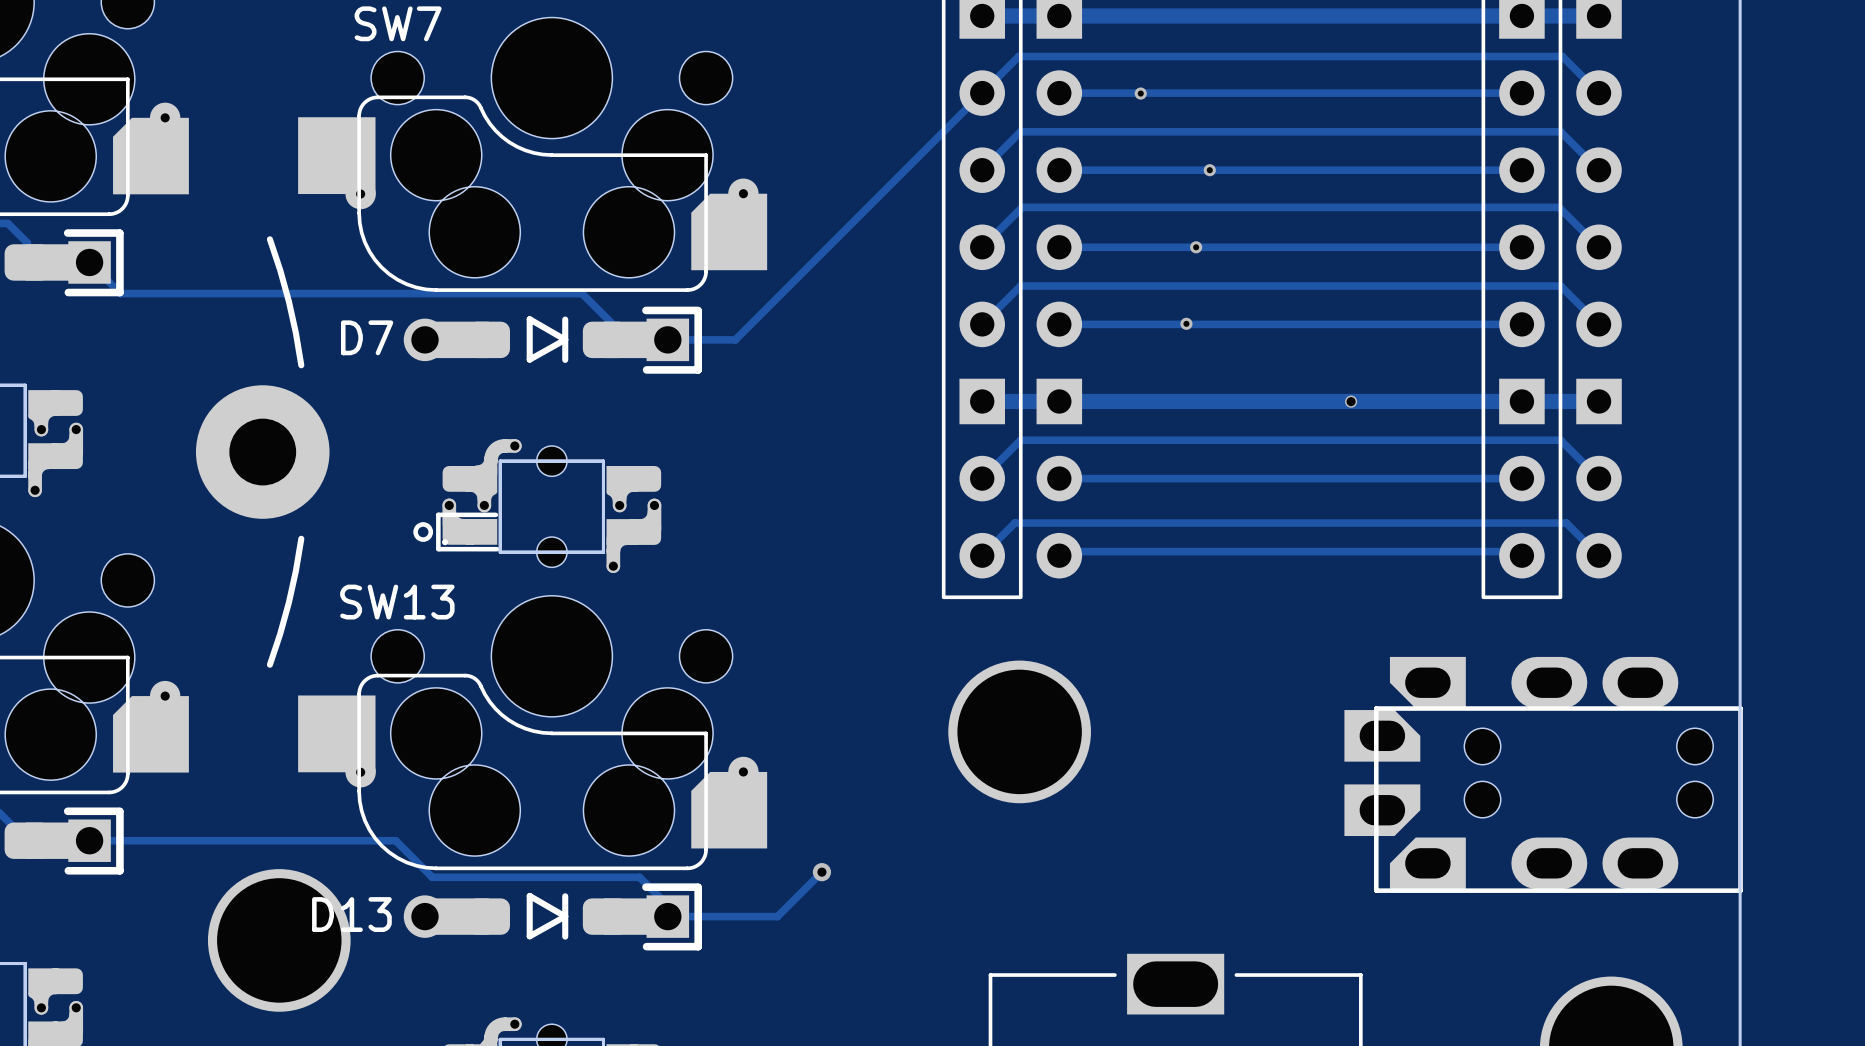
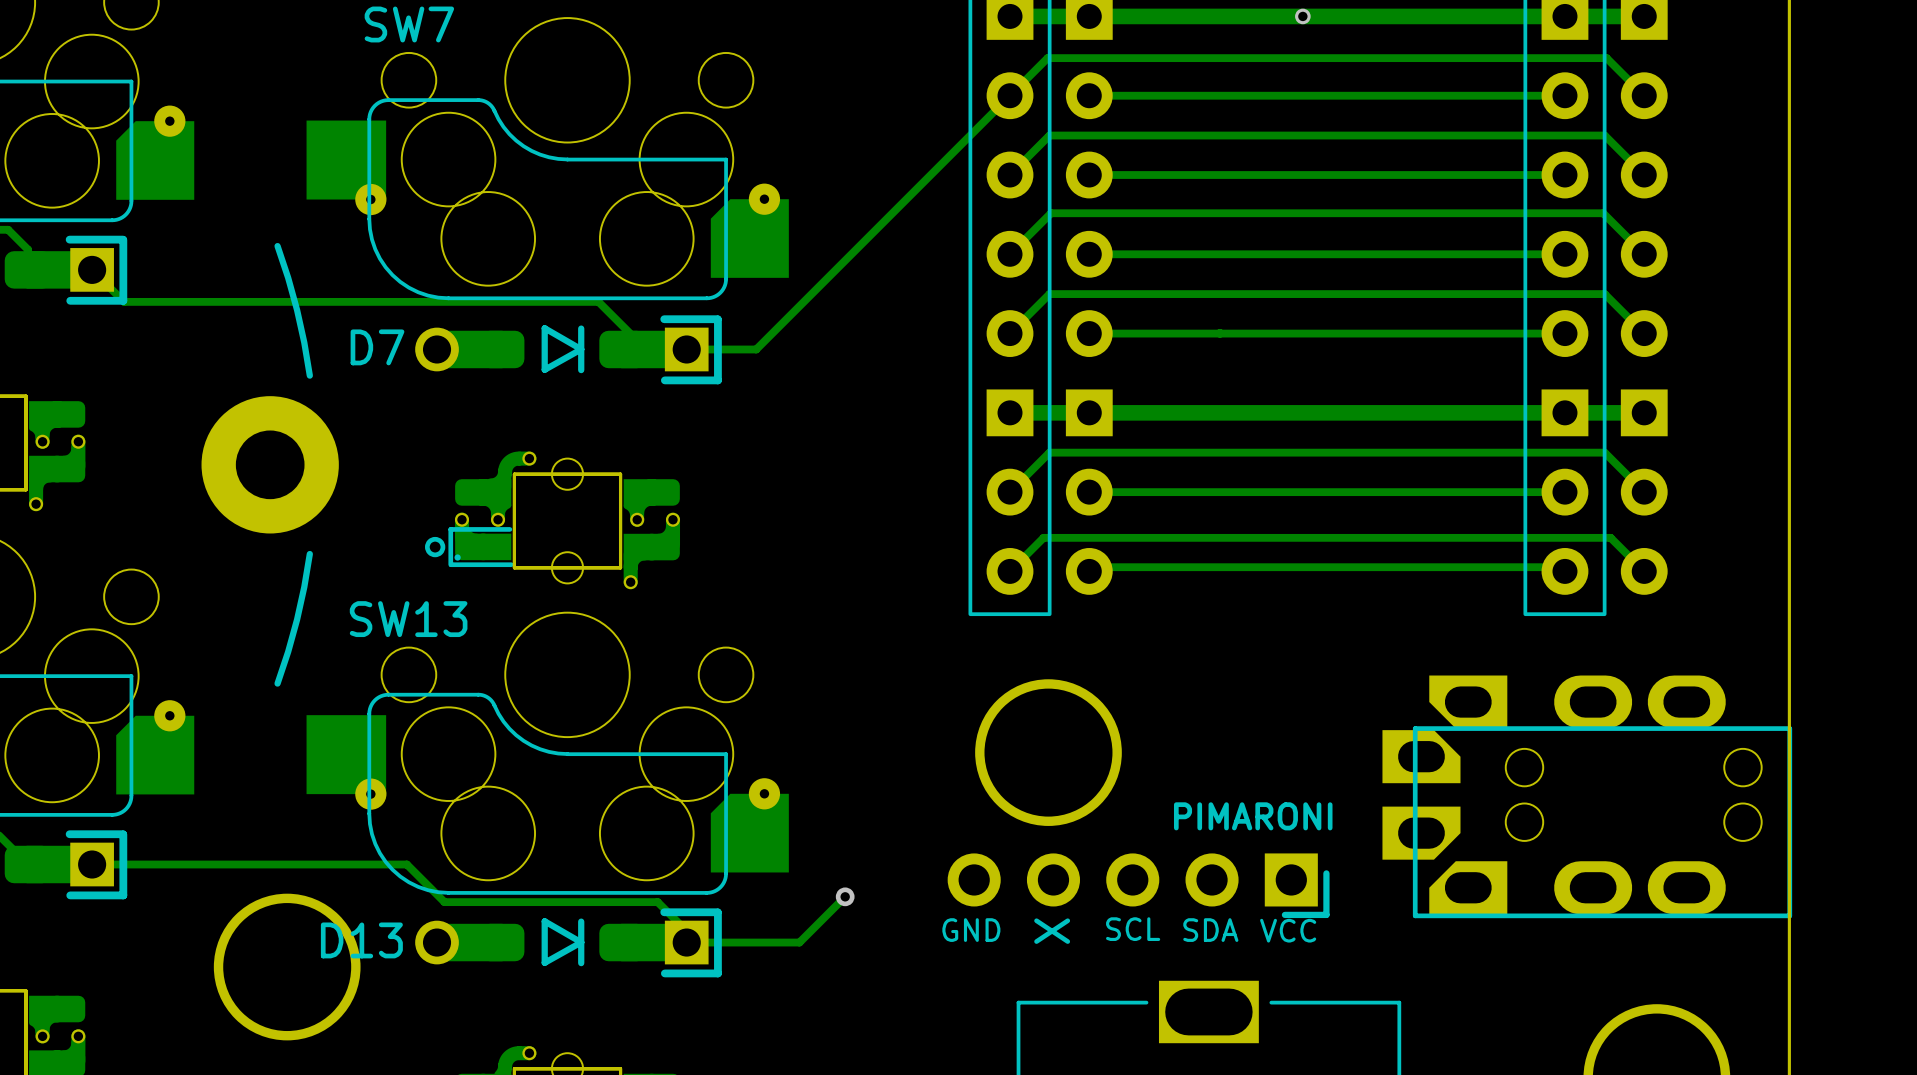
via: none -> (1302, 16)
via: (1140, 93) -> none
via: (1209, 170) -> none
via: (1196, 247) -> none
via: (1186, 323) -> none
via: (1351, 401) -> none
part: none -> (1138, 885)

